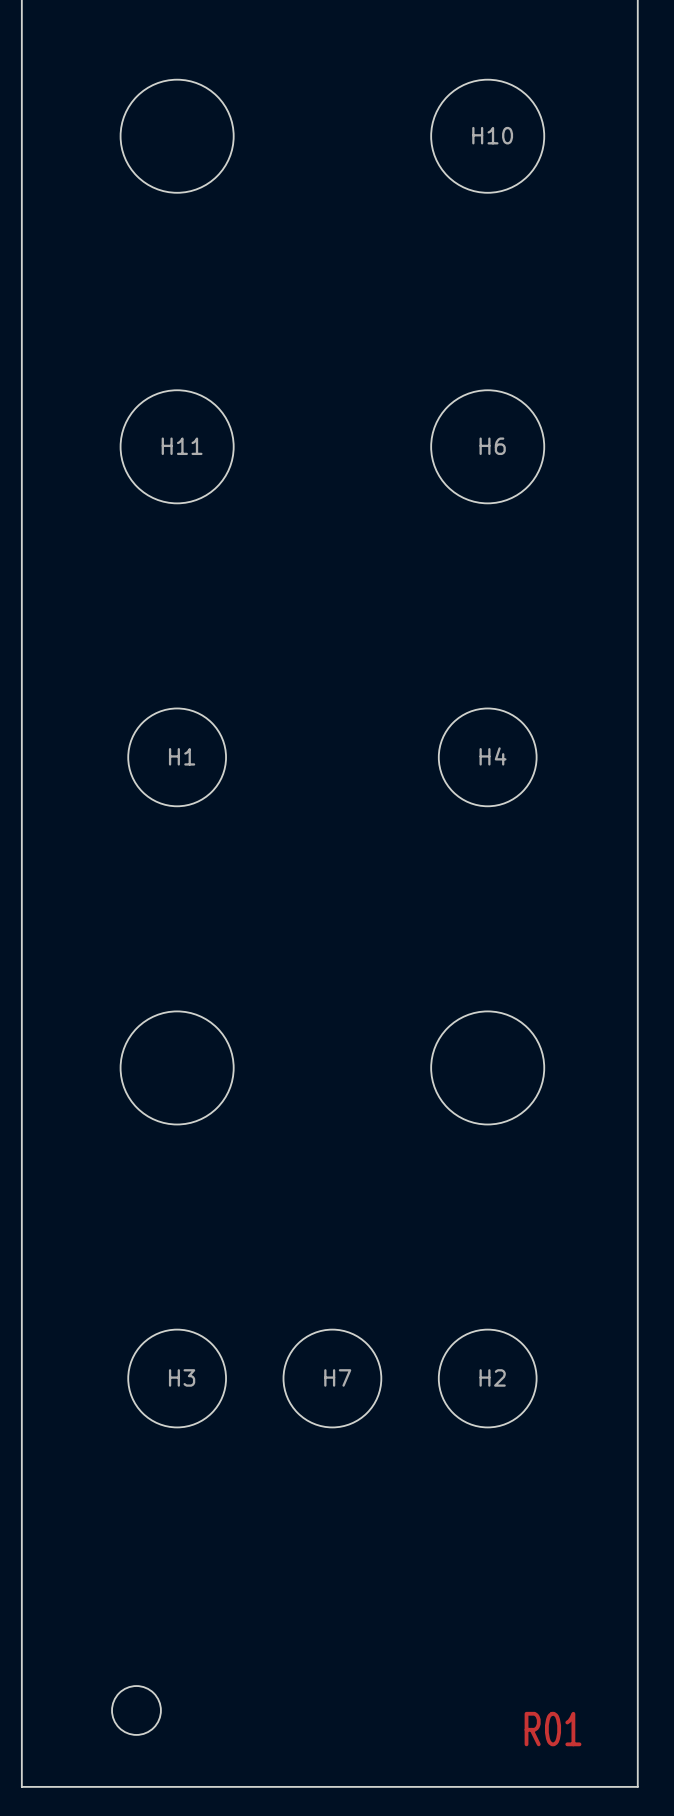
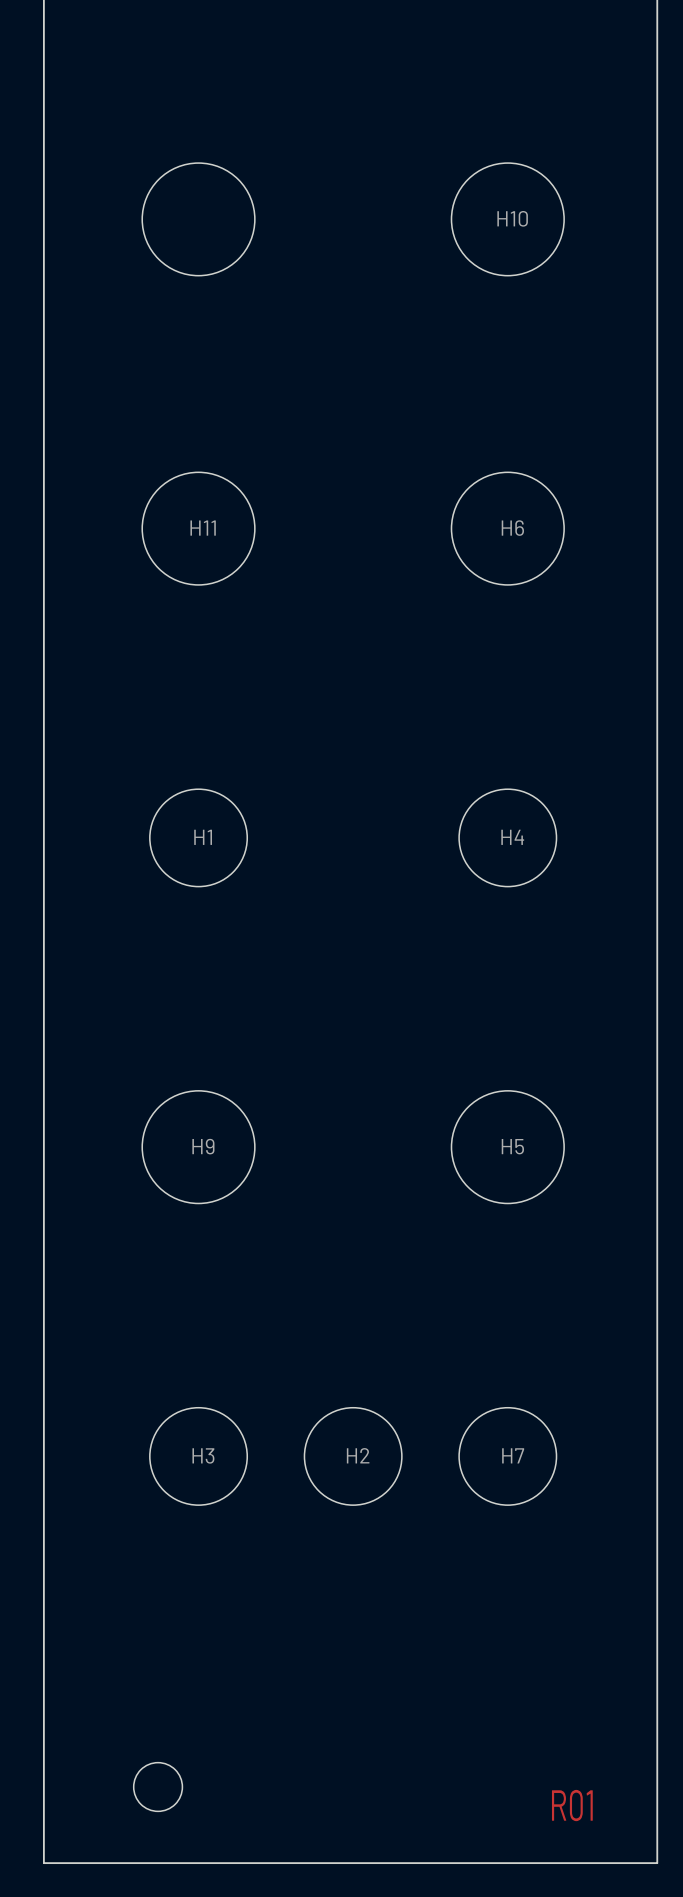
H9 name: none -> H9 (203, 1146)
H5 name: none -> H5 (512, 1146)
H7 name: H7 (337, 1377) -> H2 (358, 1455)
H2 name: H2 (492, 1377) -> H7 (513, 1455)

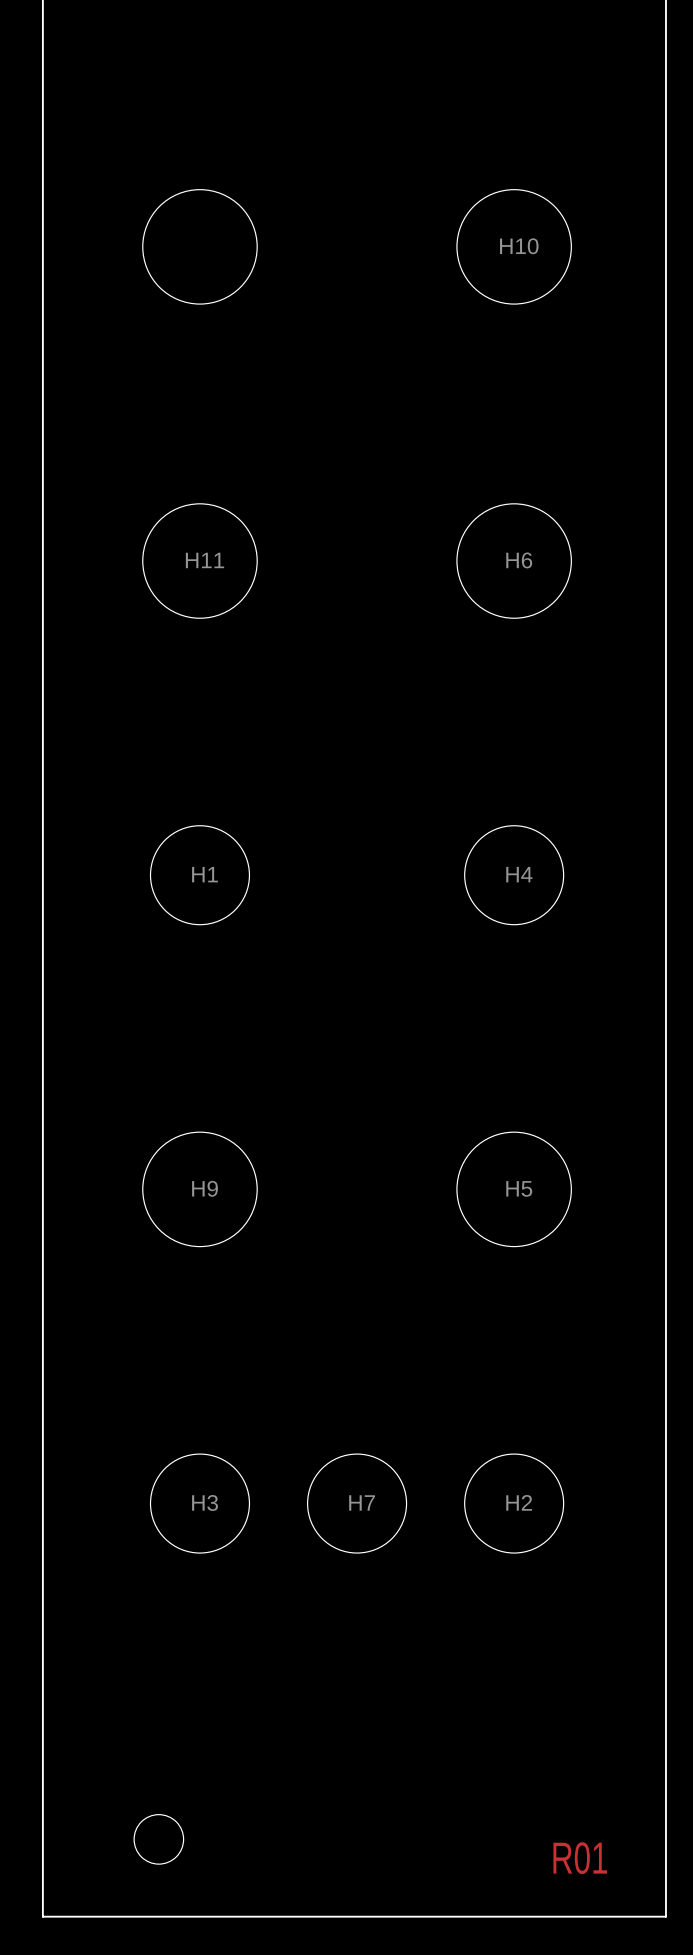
H2 name: H2 (358, 1455) -> H7 (362, 1502)
H7 name: H7 (513, 1455) -> H2 (519, 1502)

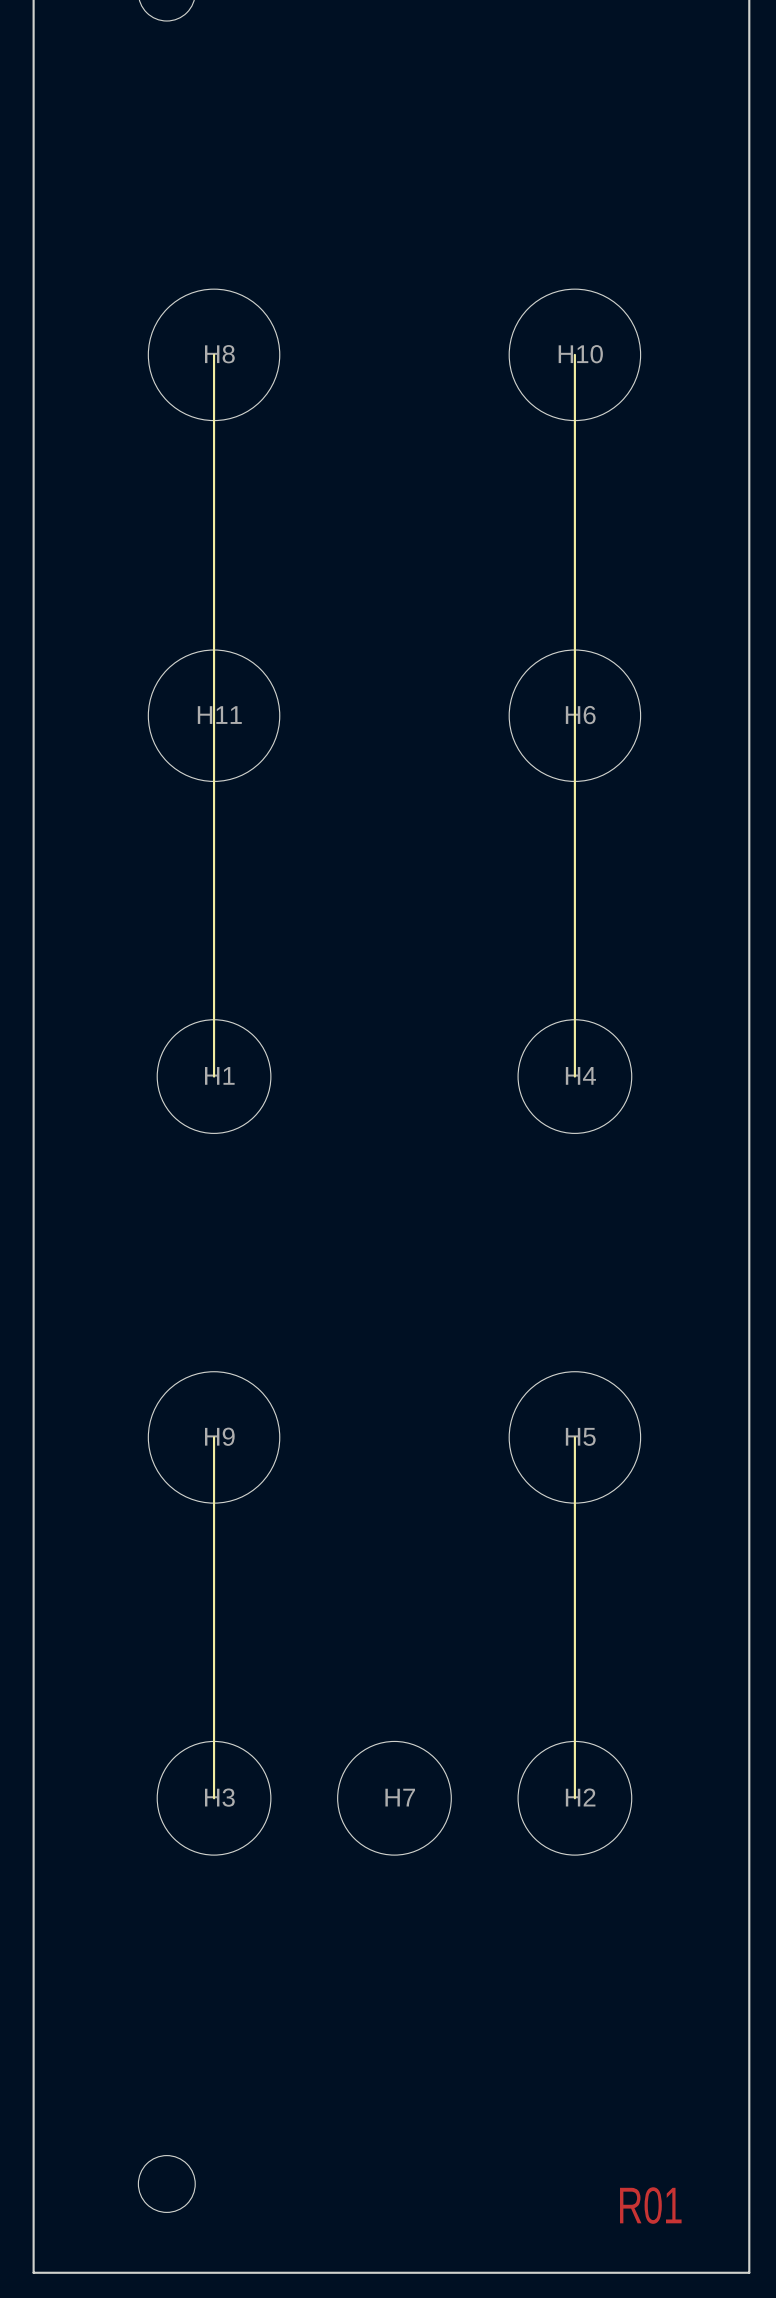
line: none -> (214, 354) (214, 1076)
H8 name: none -> H8 (219, 354)
line: none -> (574, 354) (574, 1076)
line: none -> (214, 1437) (214, 1798)
line: none -> (574, 1437) (574, 1798)

